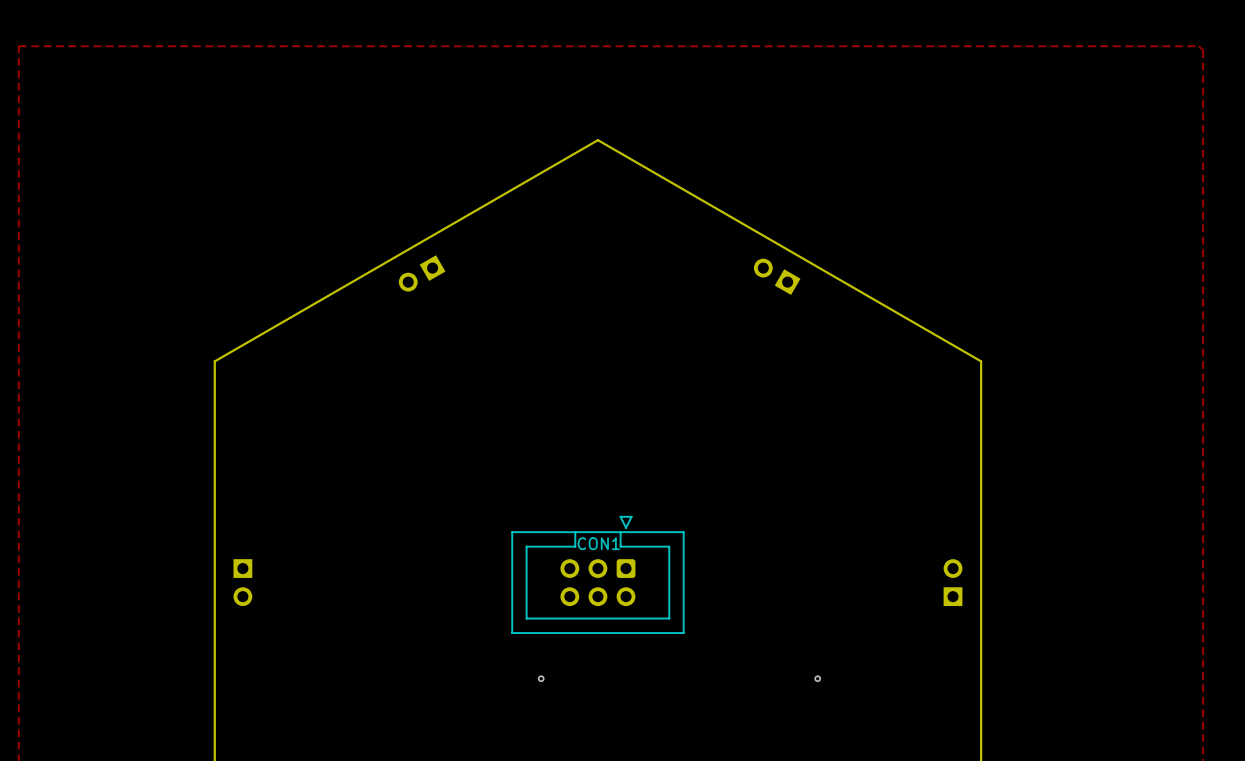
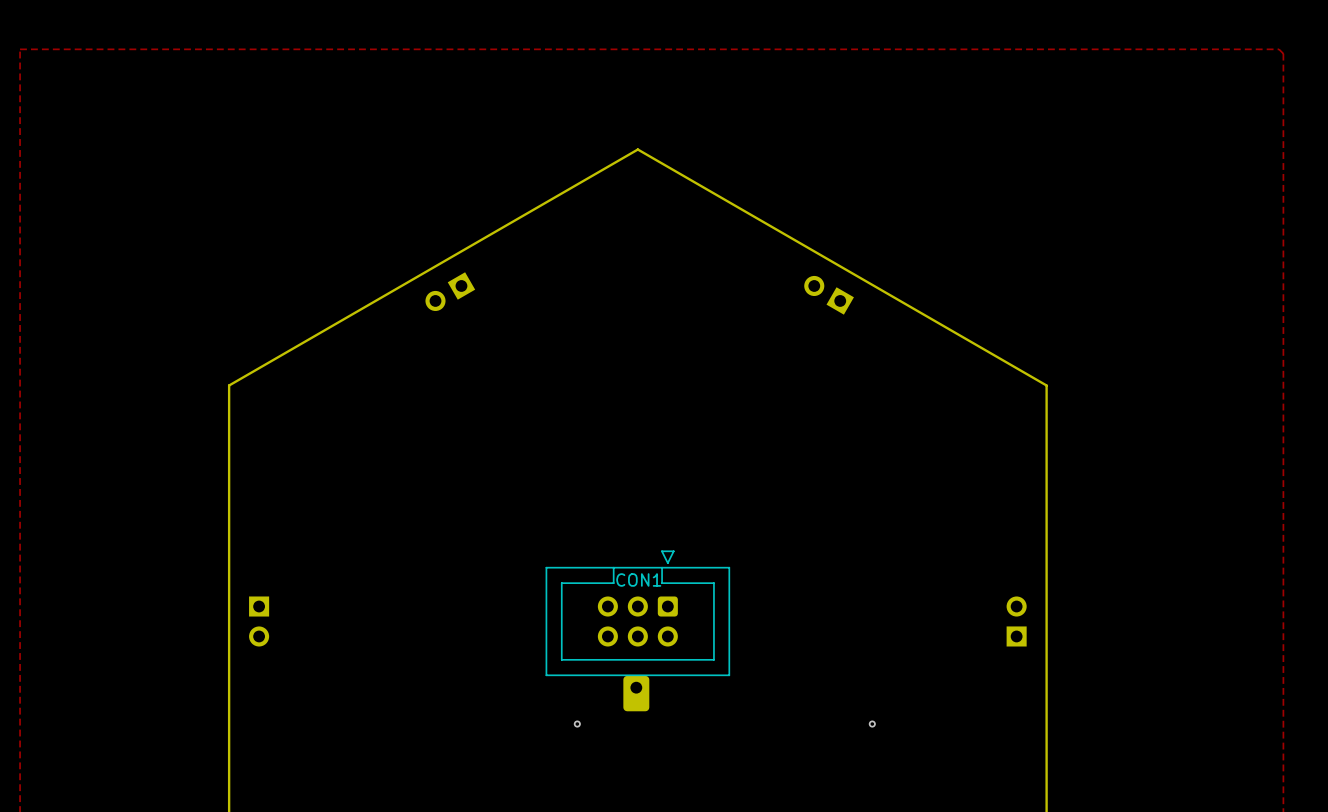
part: none -> (636, 693)

